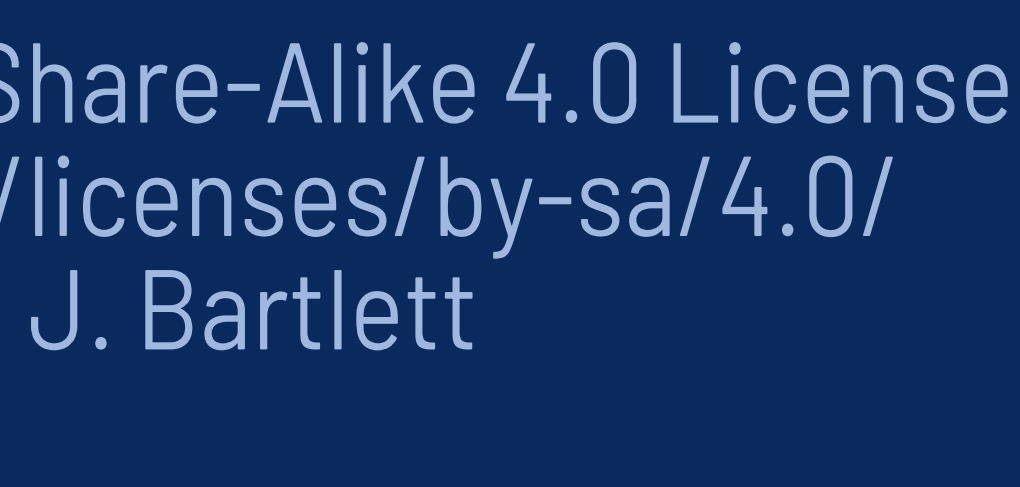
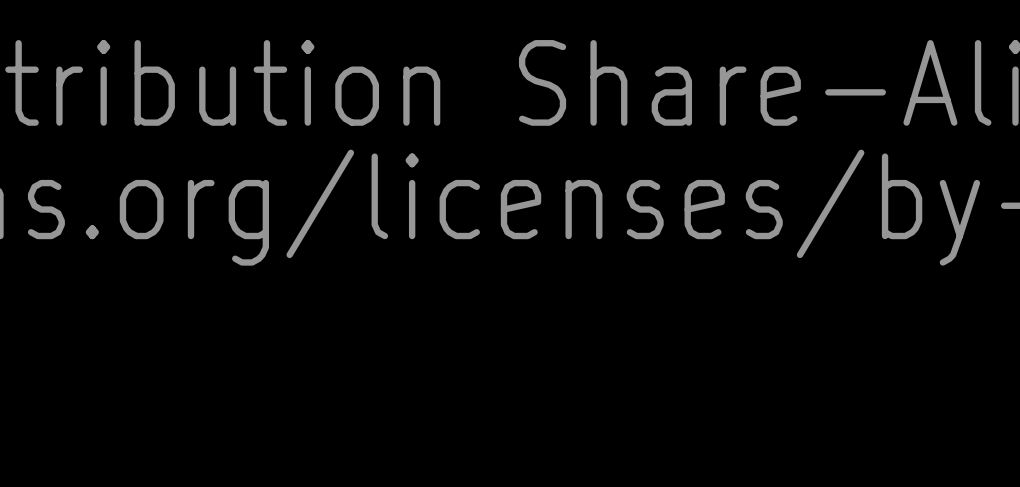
text: J. Bartlett (251, 310) -> none

